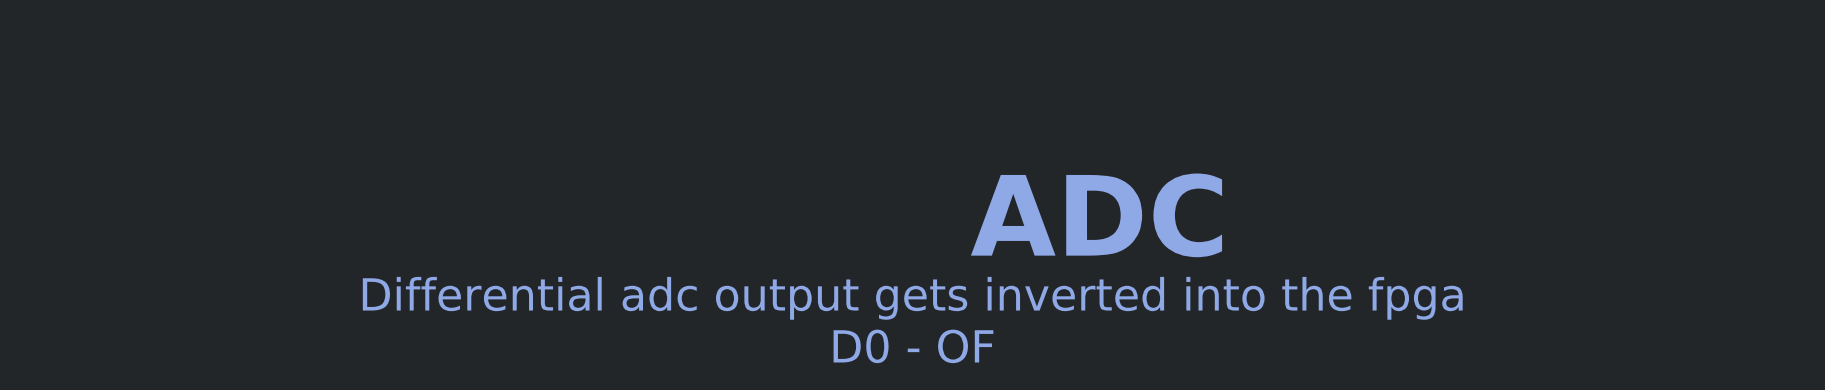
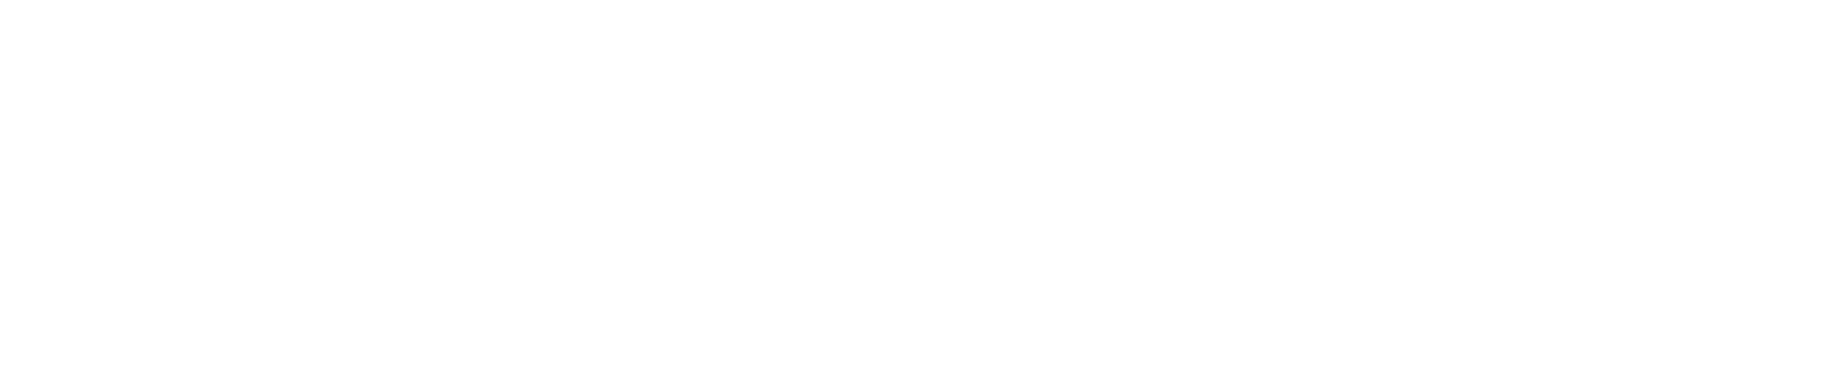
text: ADC (1096, 215) -> none
text: Differential adc output gets inverted into the fpga (912, 298) -> none
text: D0 - OF (913, 346) -> none

